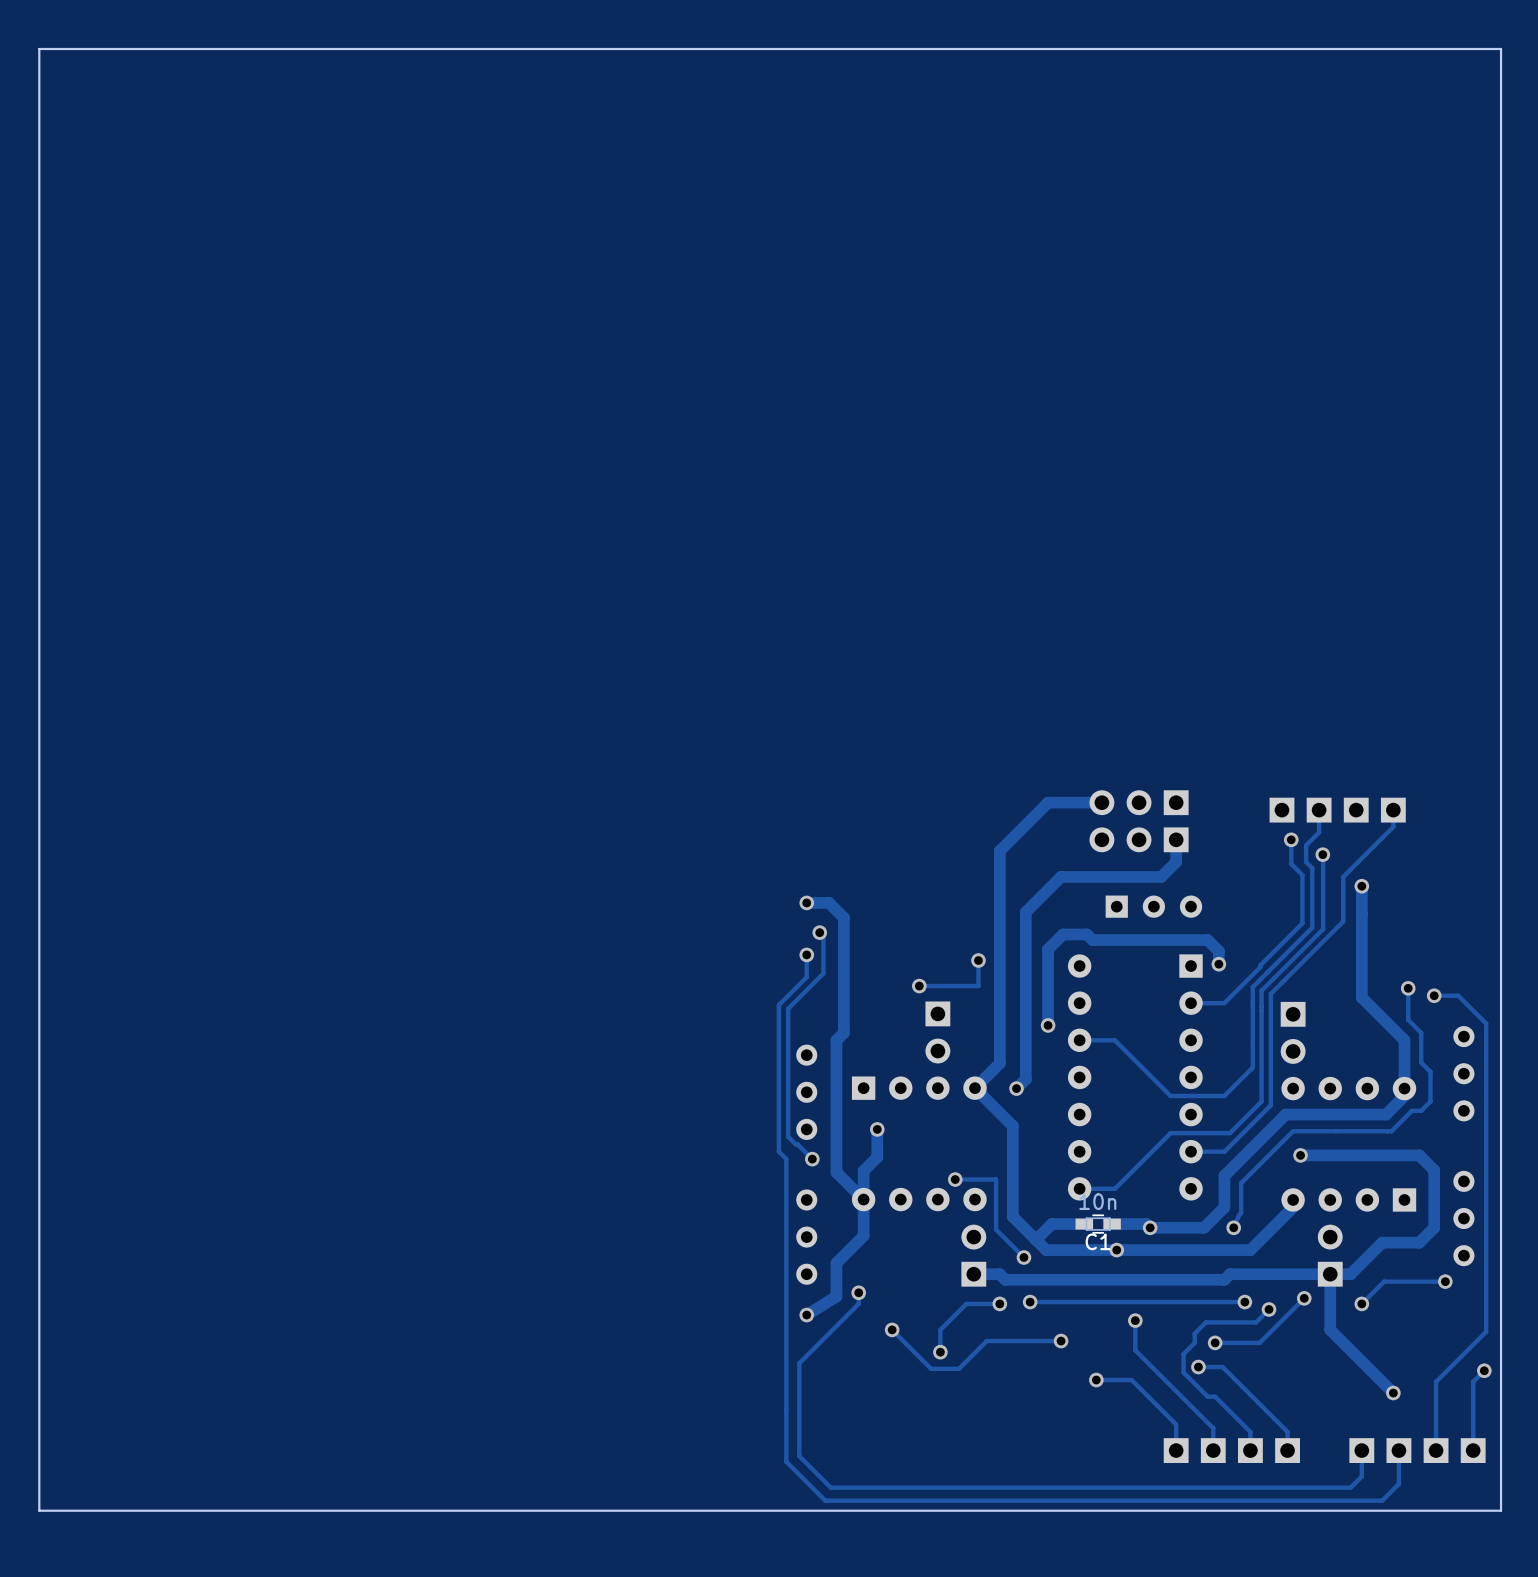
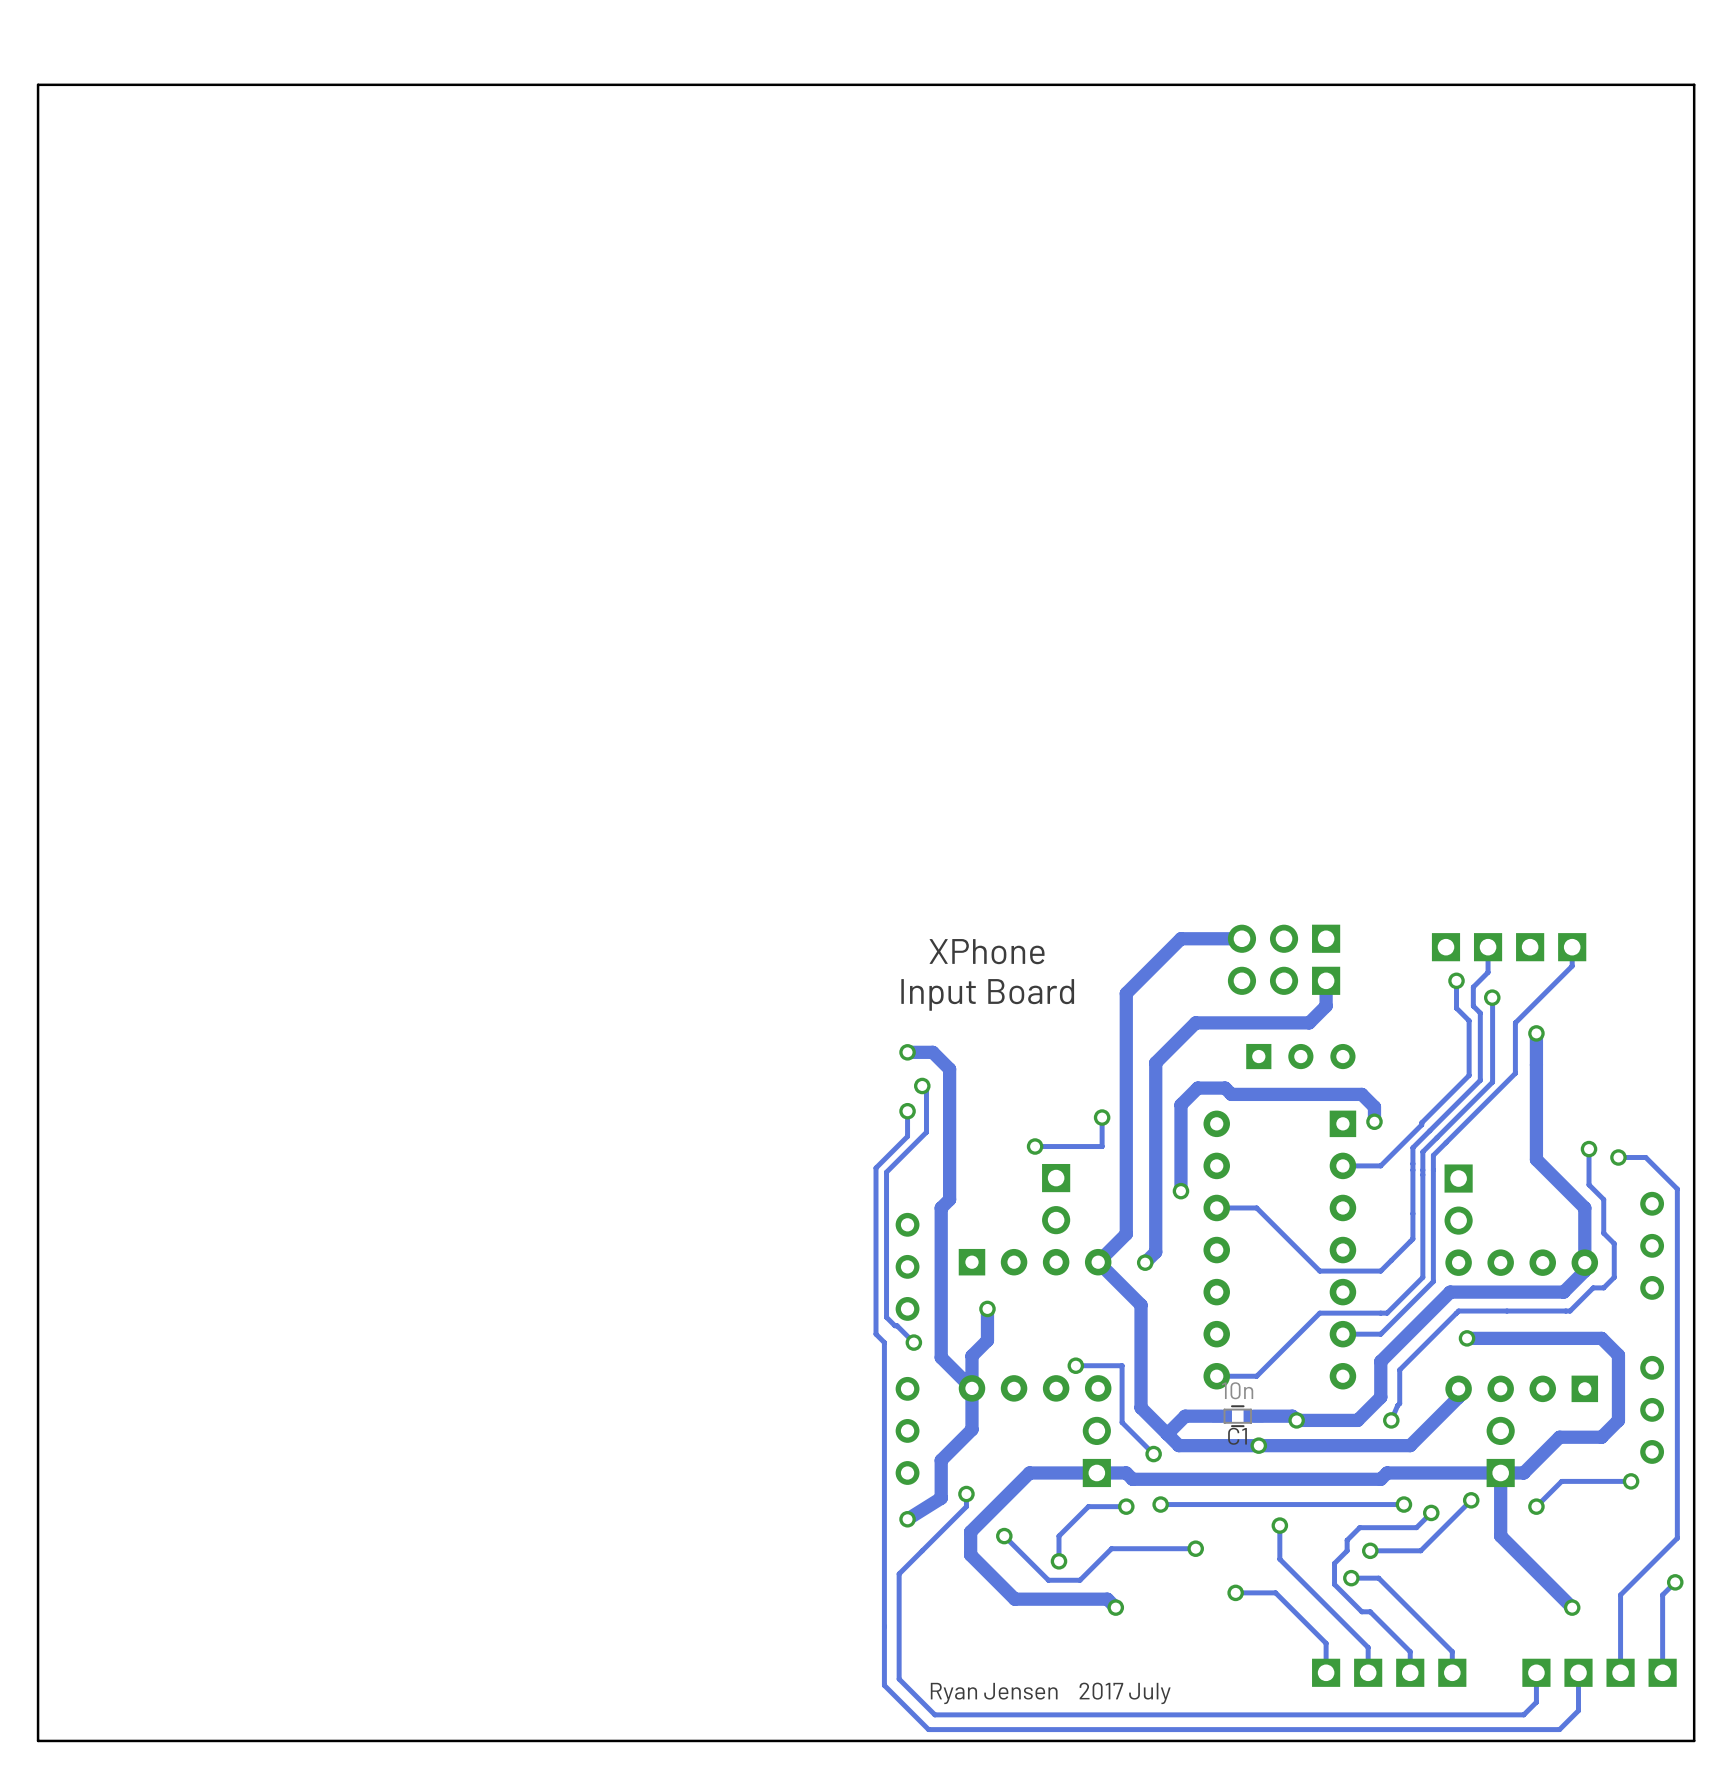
text: none -> XPhone (987, 951)
text: none -> Input Board (987, 994)
track: none -> (1096, 1472) (1029, 1472) (970, 1531) (970, 1555) (1014, 1599) (1107, 1599) (1115, 1607)
via: none -> (1115, 1607)
text: none -> Ryan Jensen 2017 July (1050, 1693)

